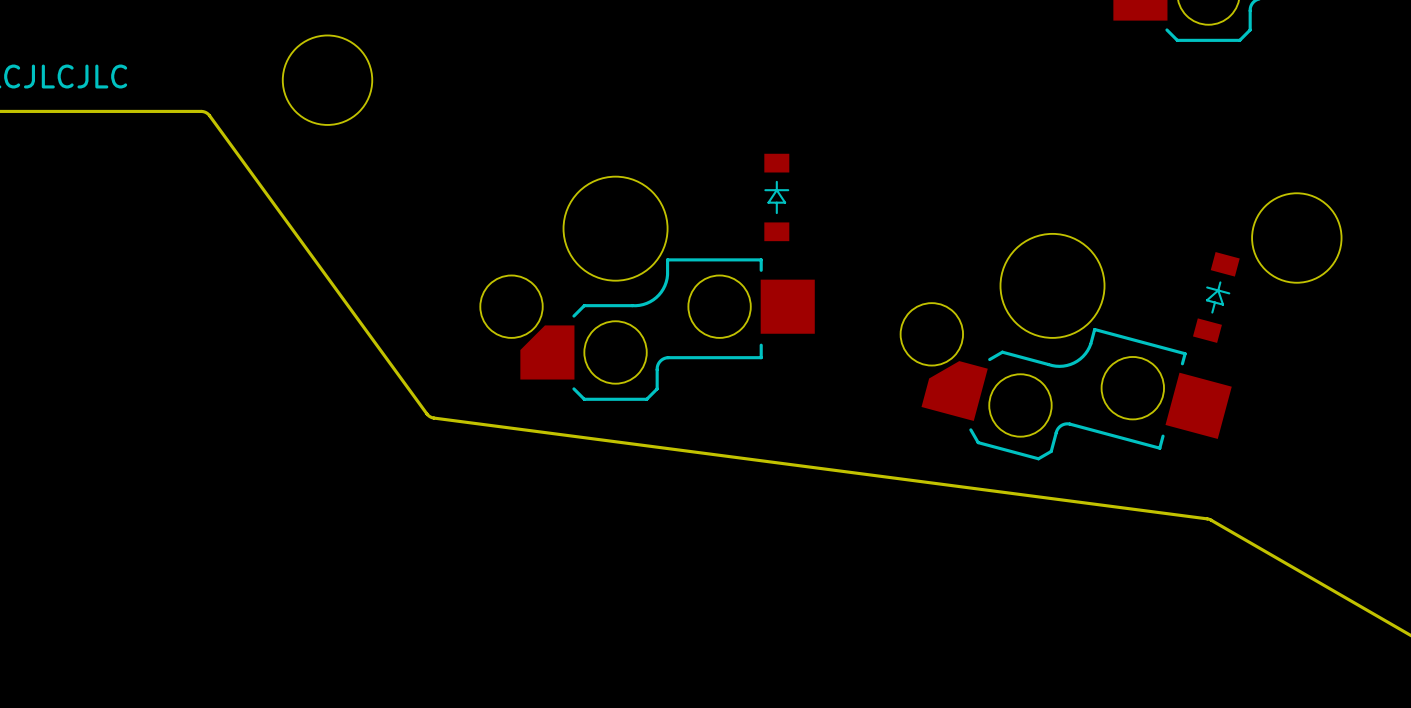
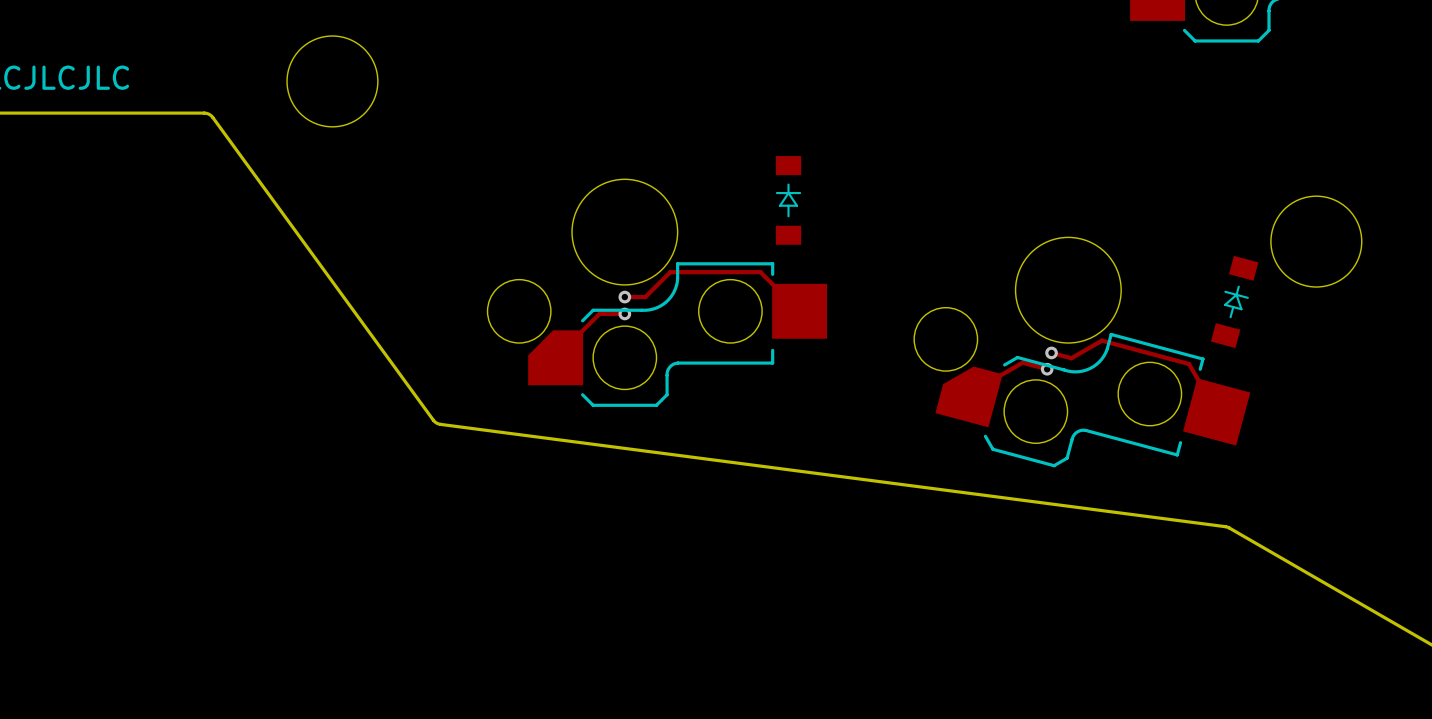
track: none -> (624, 297) (645, 297) (670, 272) (760, 272) (799, 311)
via: none -> (624, 297)
track: none -> (624, 313) (599, 313) (555, 357)
via: none -> (624, 313)
track: none -> (1051, 352) (1071, 358) (1101, 340) (1188, 363) (1216, 411)
via: none -> (1051, 352)
track: none -> (1047, 369) (1022, 362) (969, 393)
via: none -> (1047, 369)

